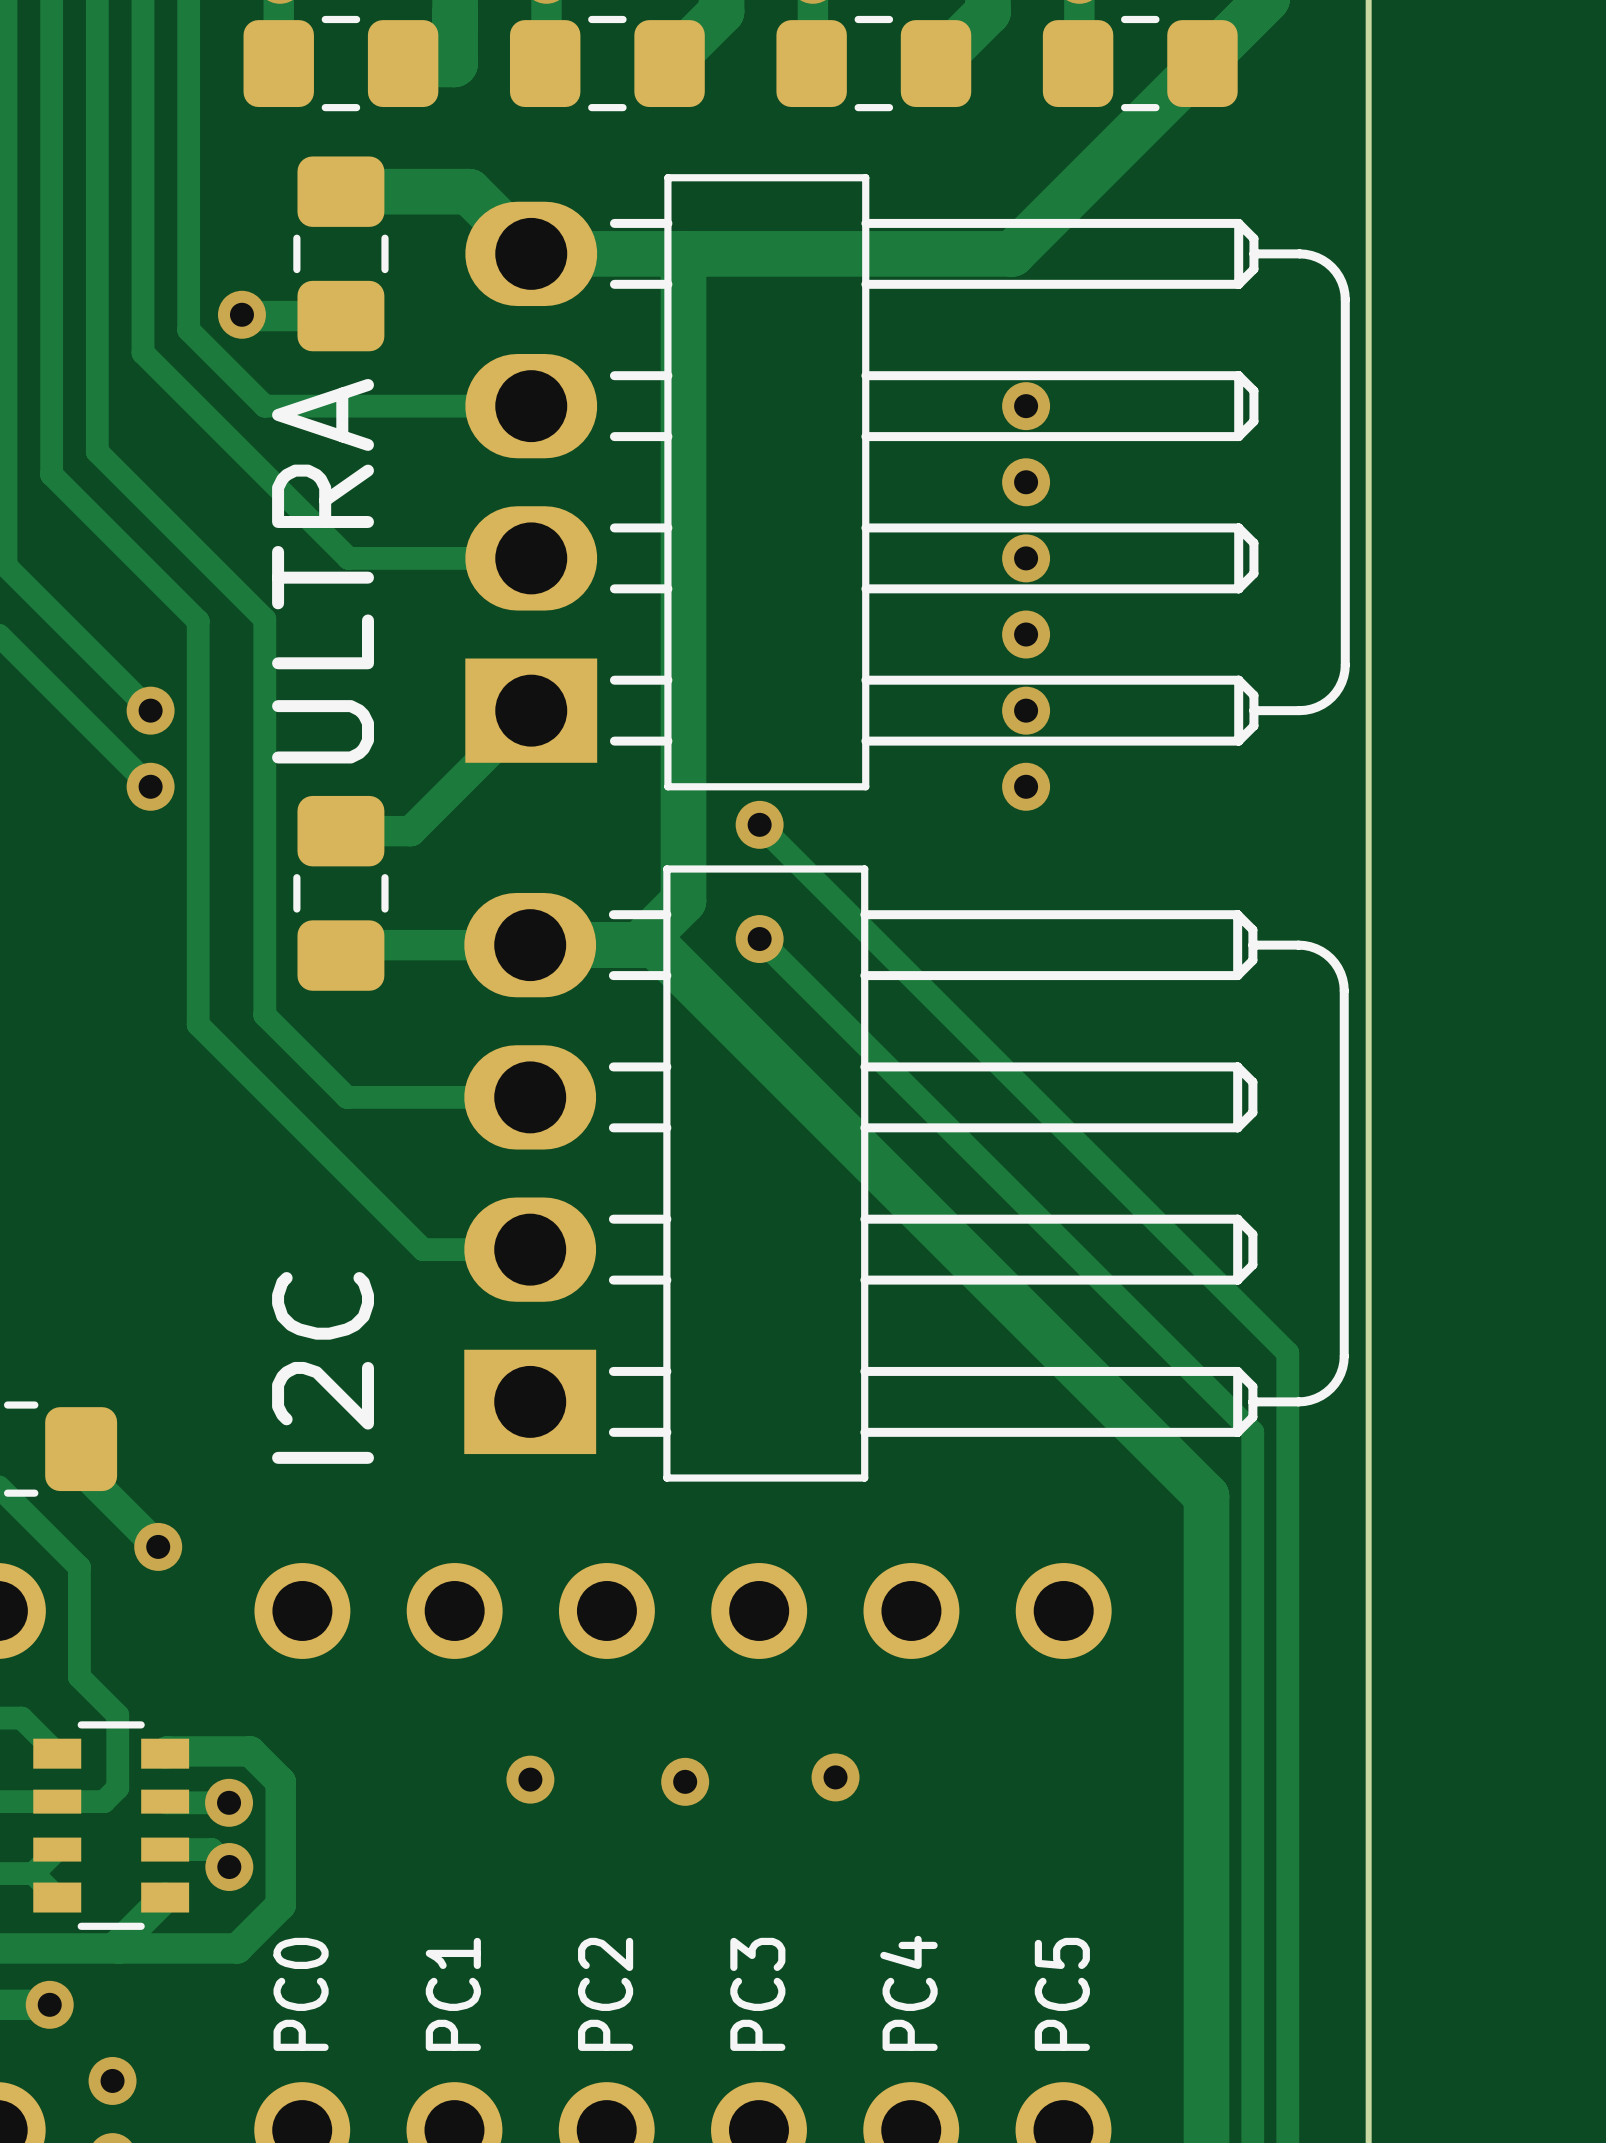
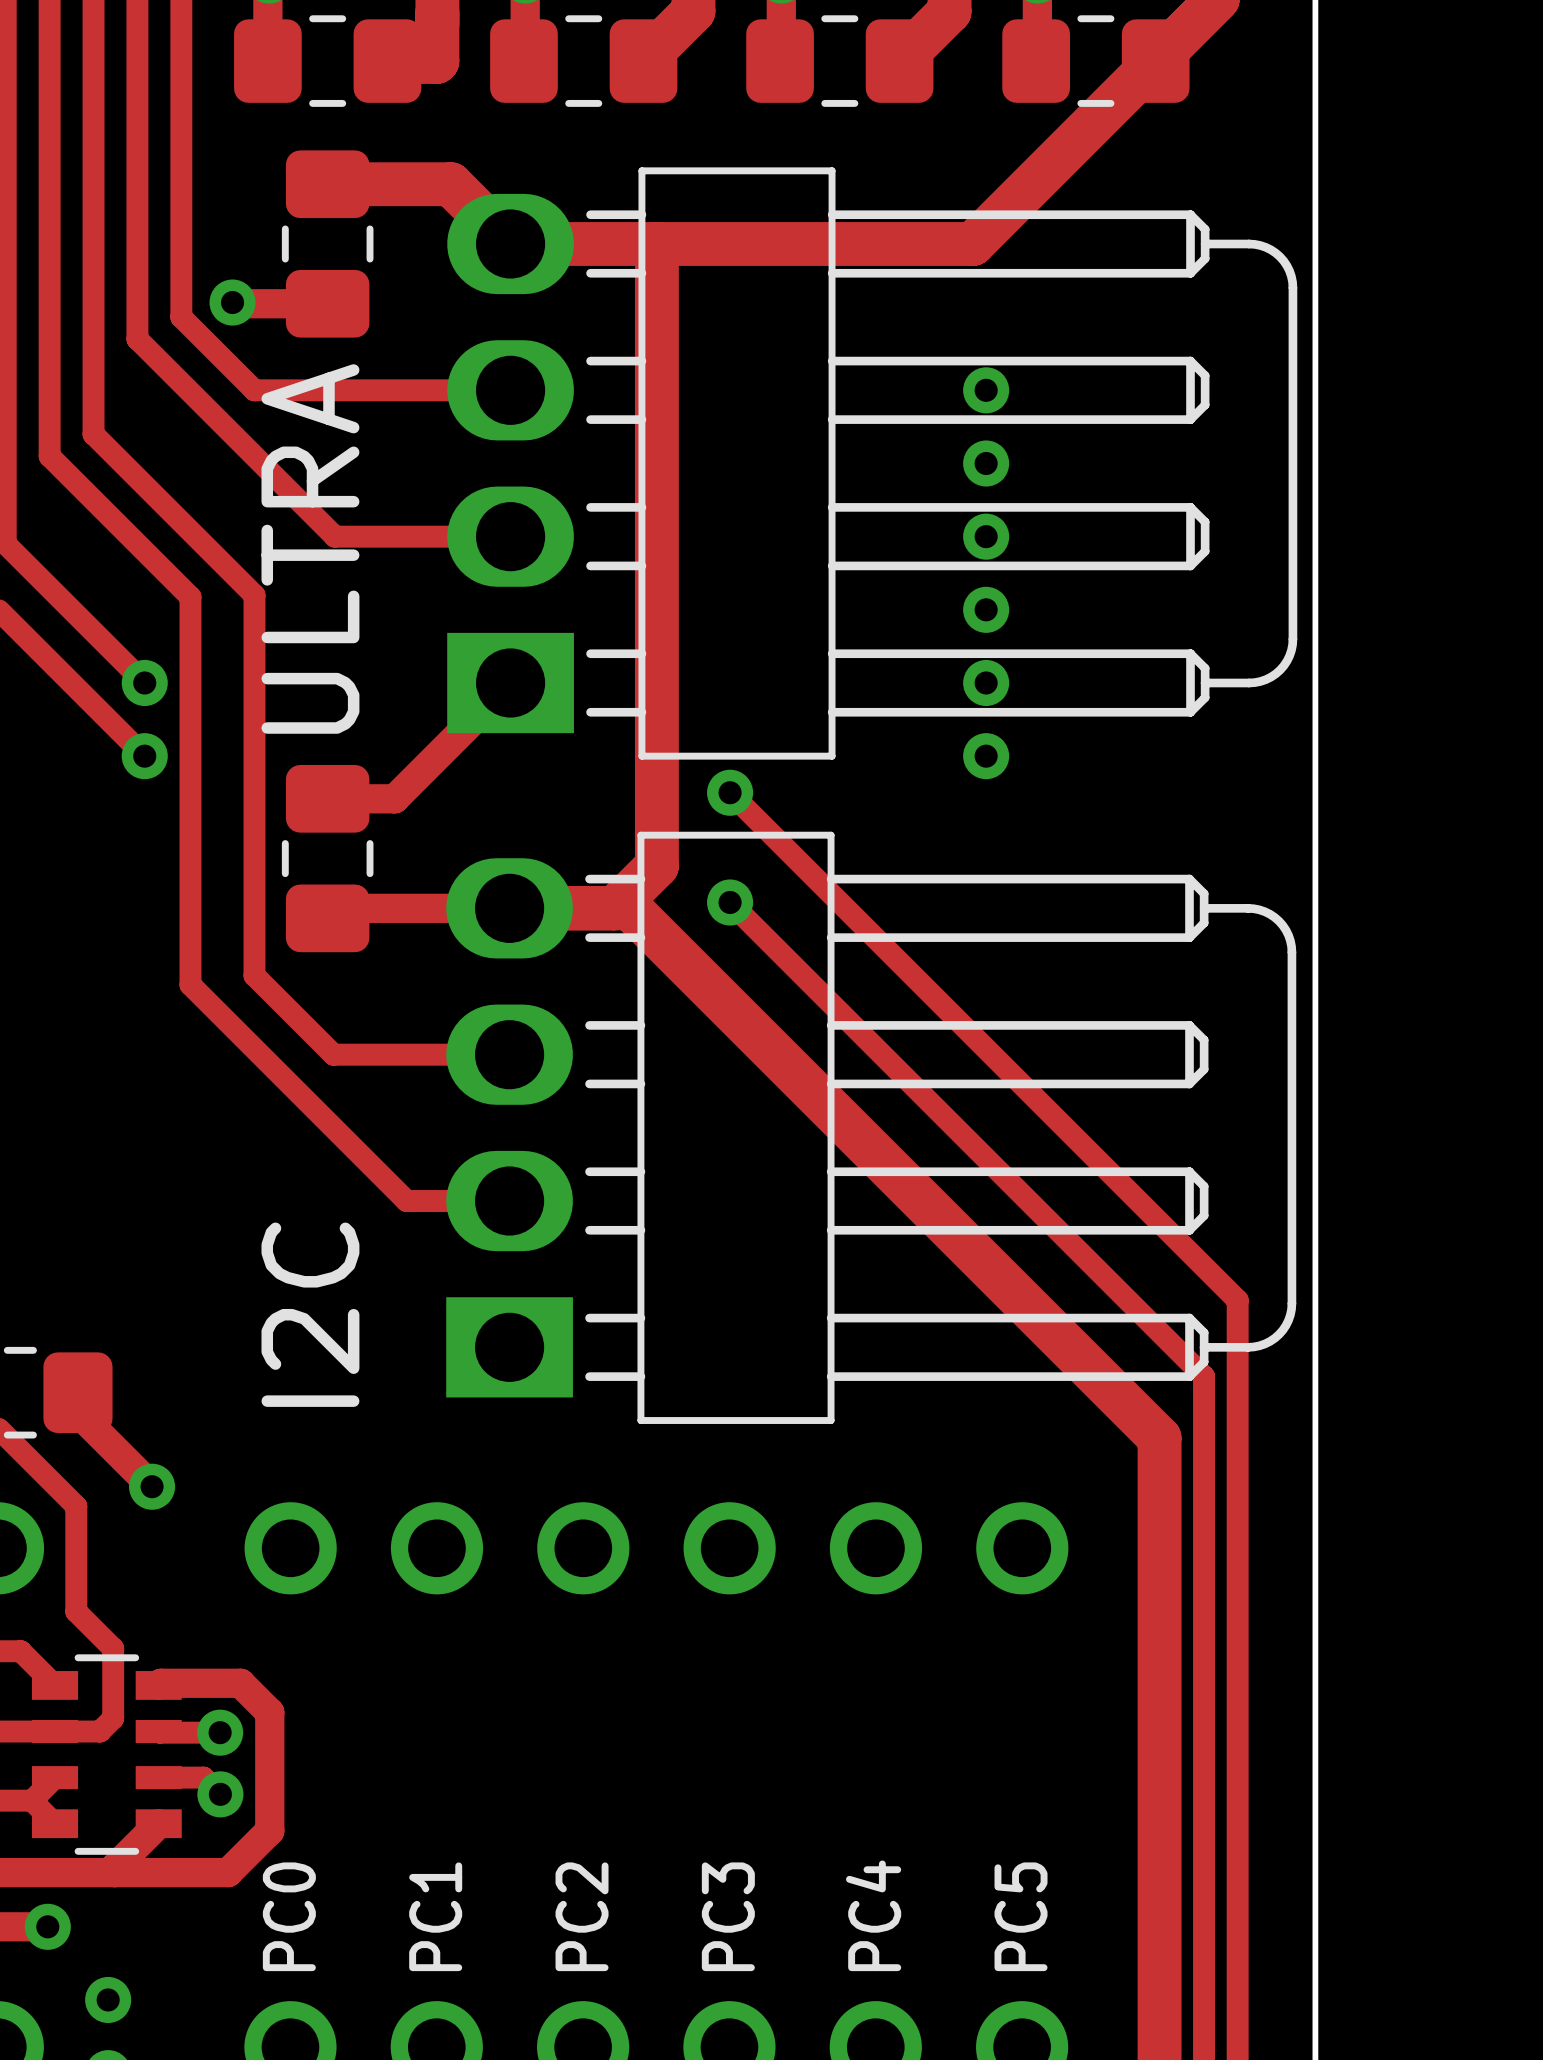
via: (835, 1777) -> none
via: (530, 1779) -> none
via: (685, 1781) -> none

